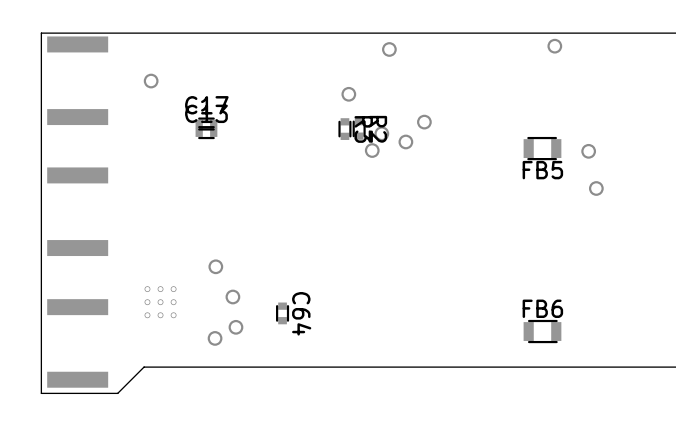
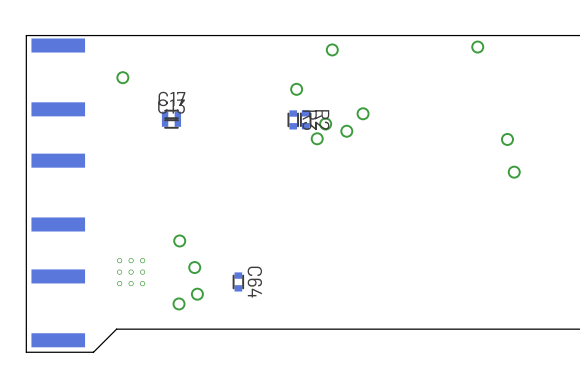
FB5: (542, 148) -> none
FB6: (542, 331) -> none

